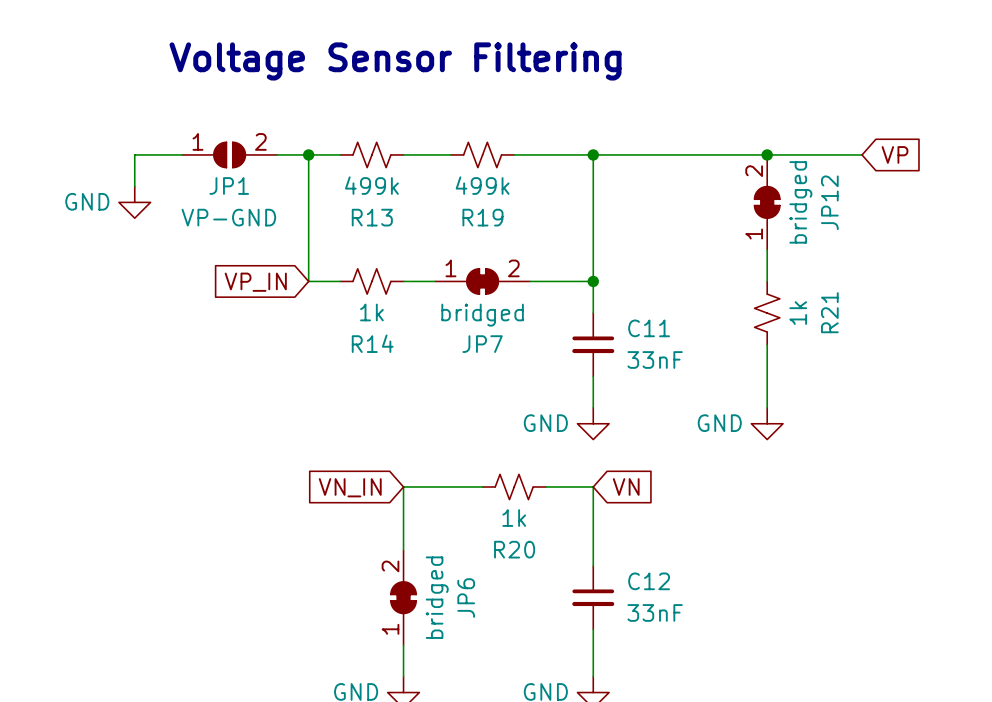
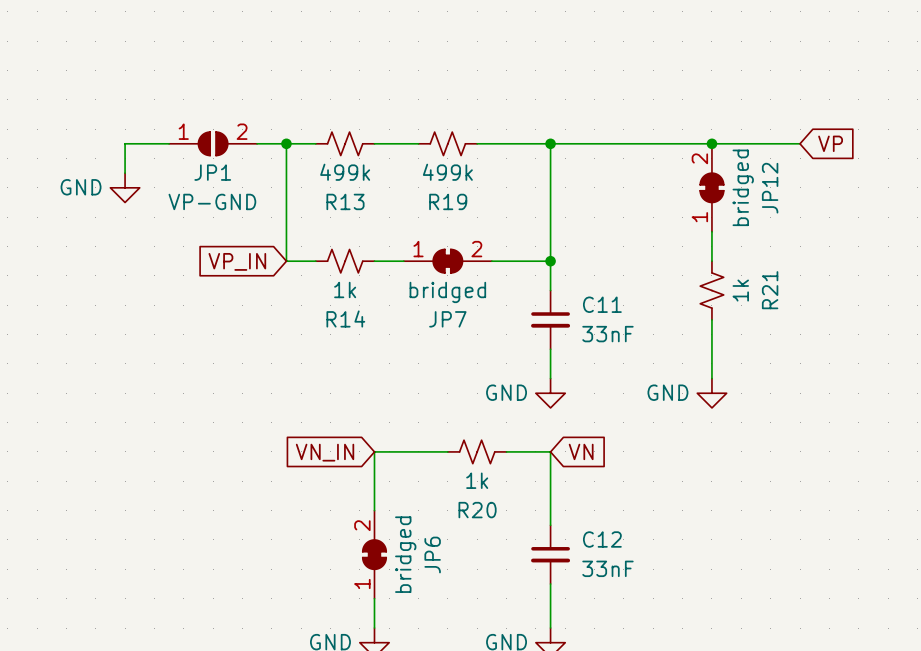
text: Voltage Sensor Filtering (395, 61) -> none

